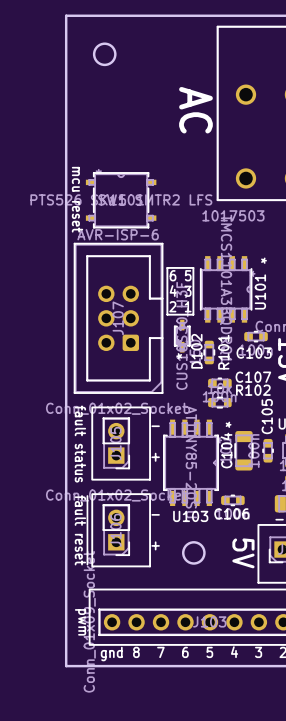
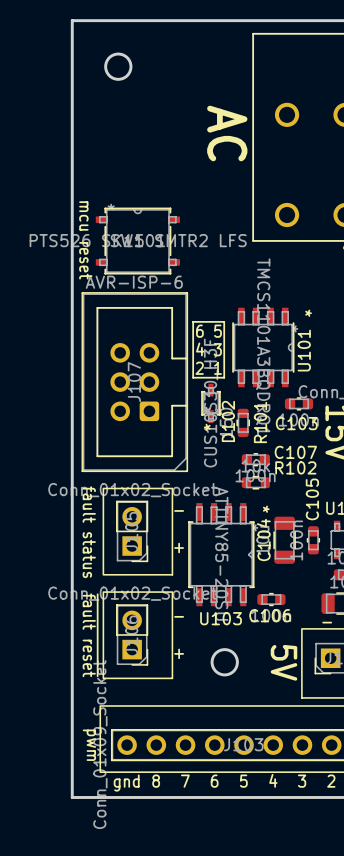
part value: 1017503 (233, 215) -> none

